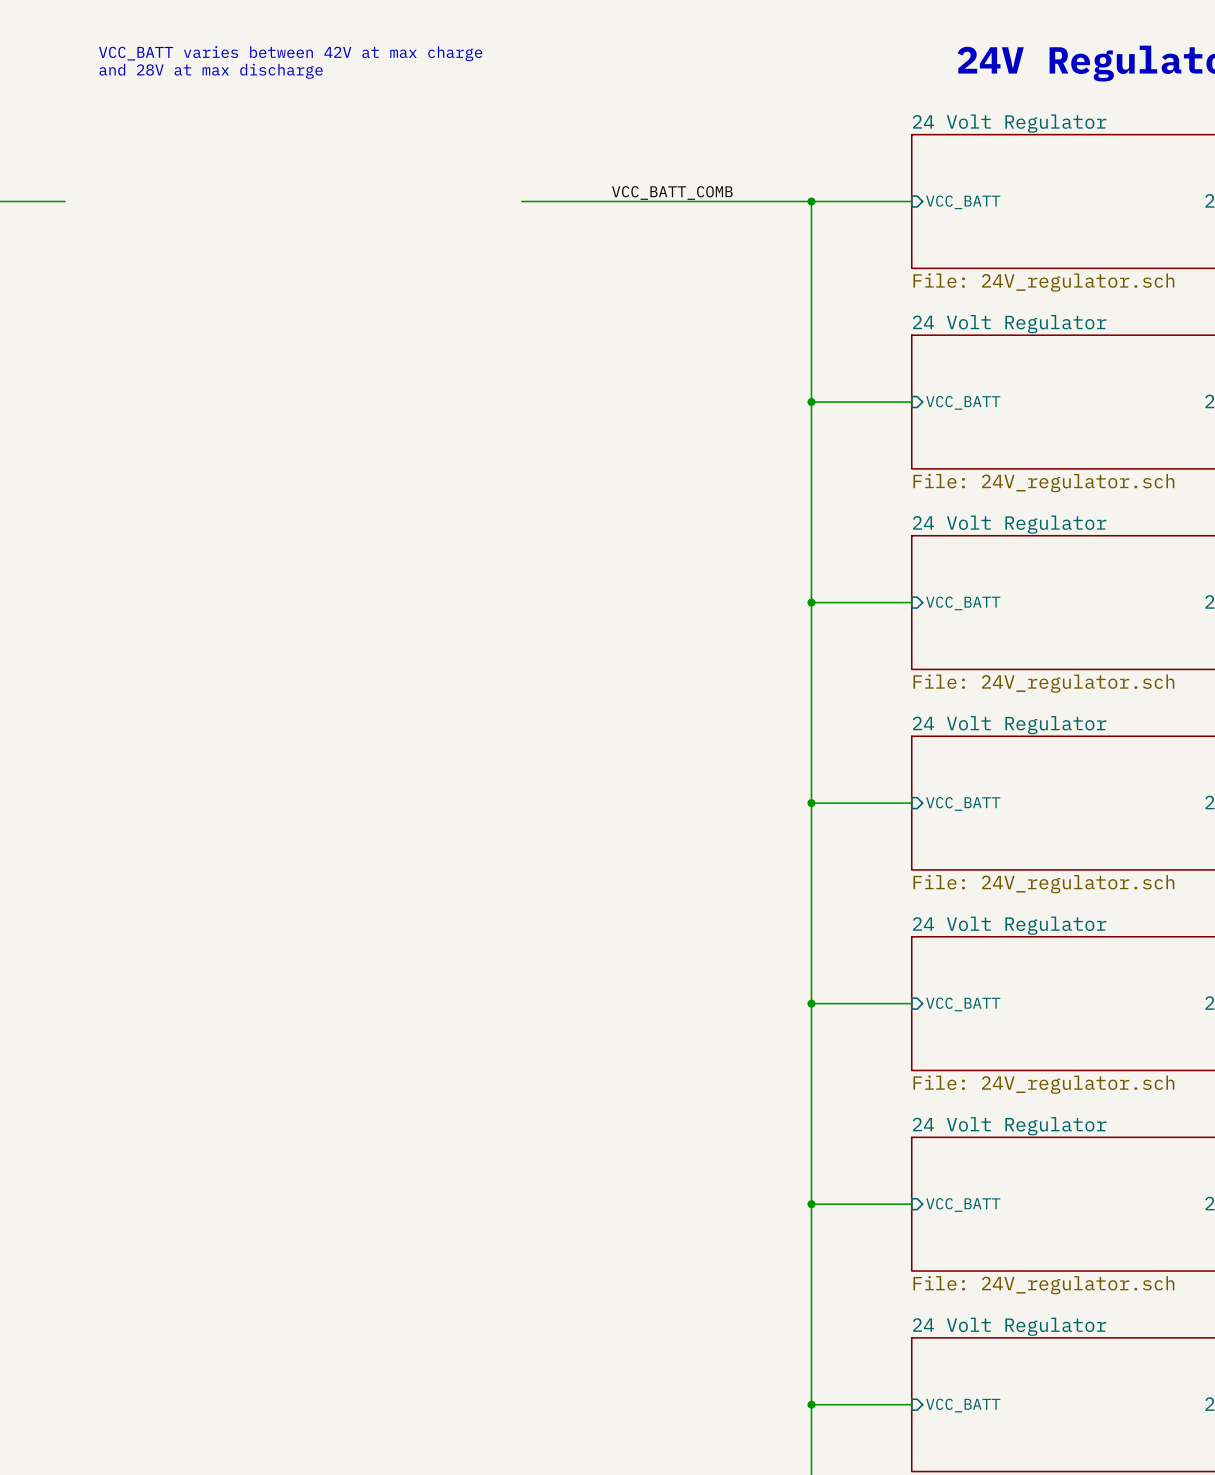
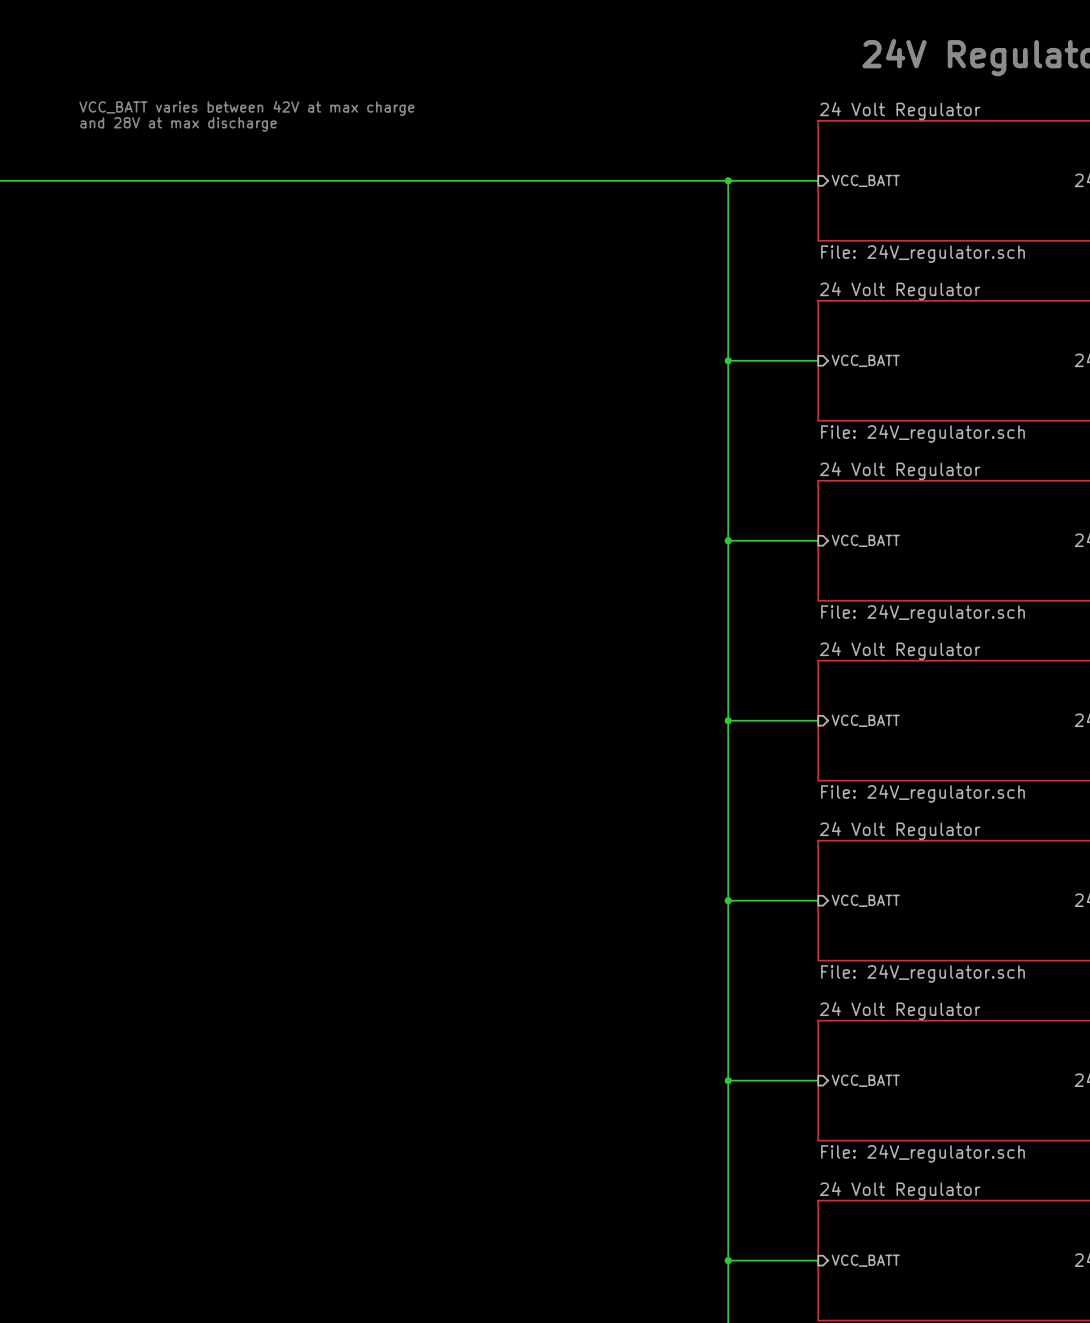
text position: VCC_BATT varies between 42V at max charge (290, 53) -> VCC_BATT varies between 42V at max charge (246, 108)
text position: and 28V at max discharge (211, 71) -> and 28V at max discharge (178, 124)
label: VCC_BATT_COMB (672, 192) -> none
wire: none -> (58, 180) (468, 180)

